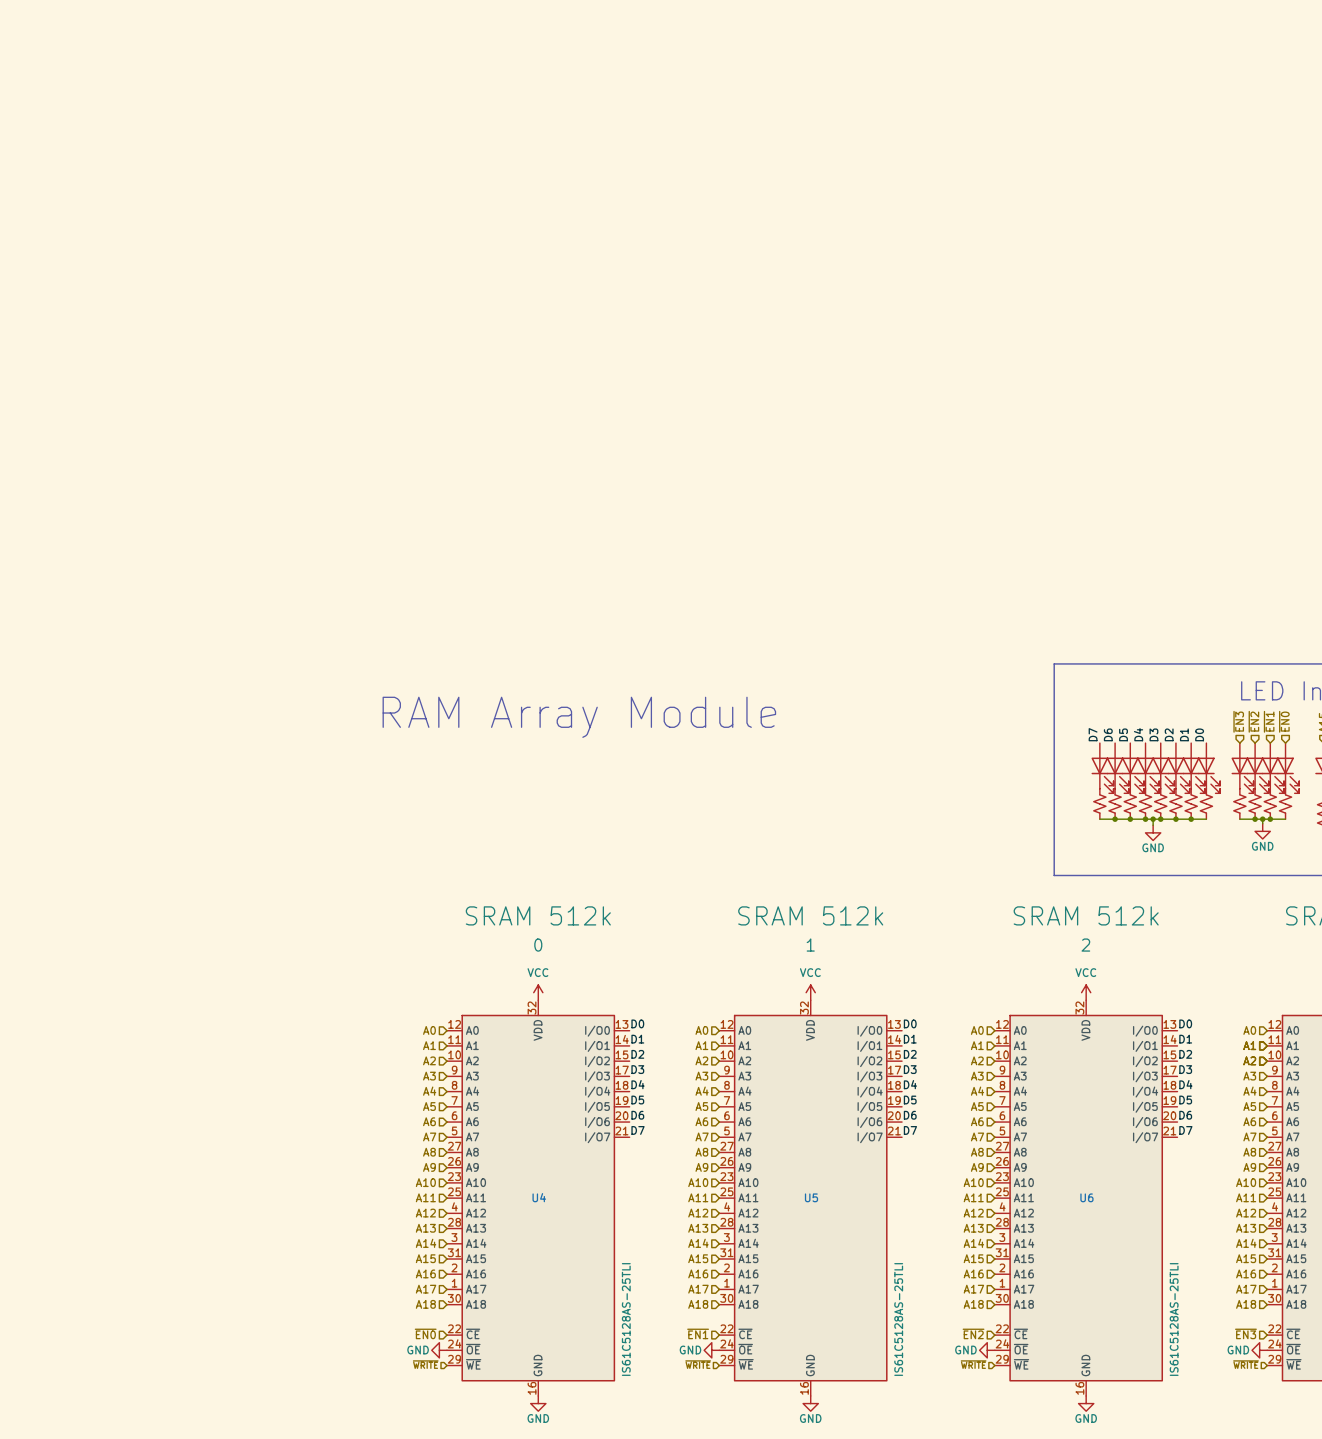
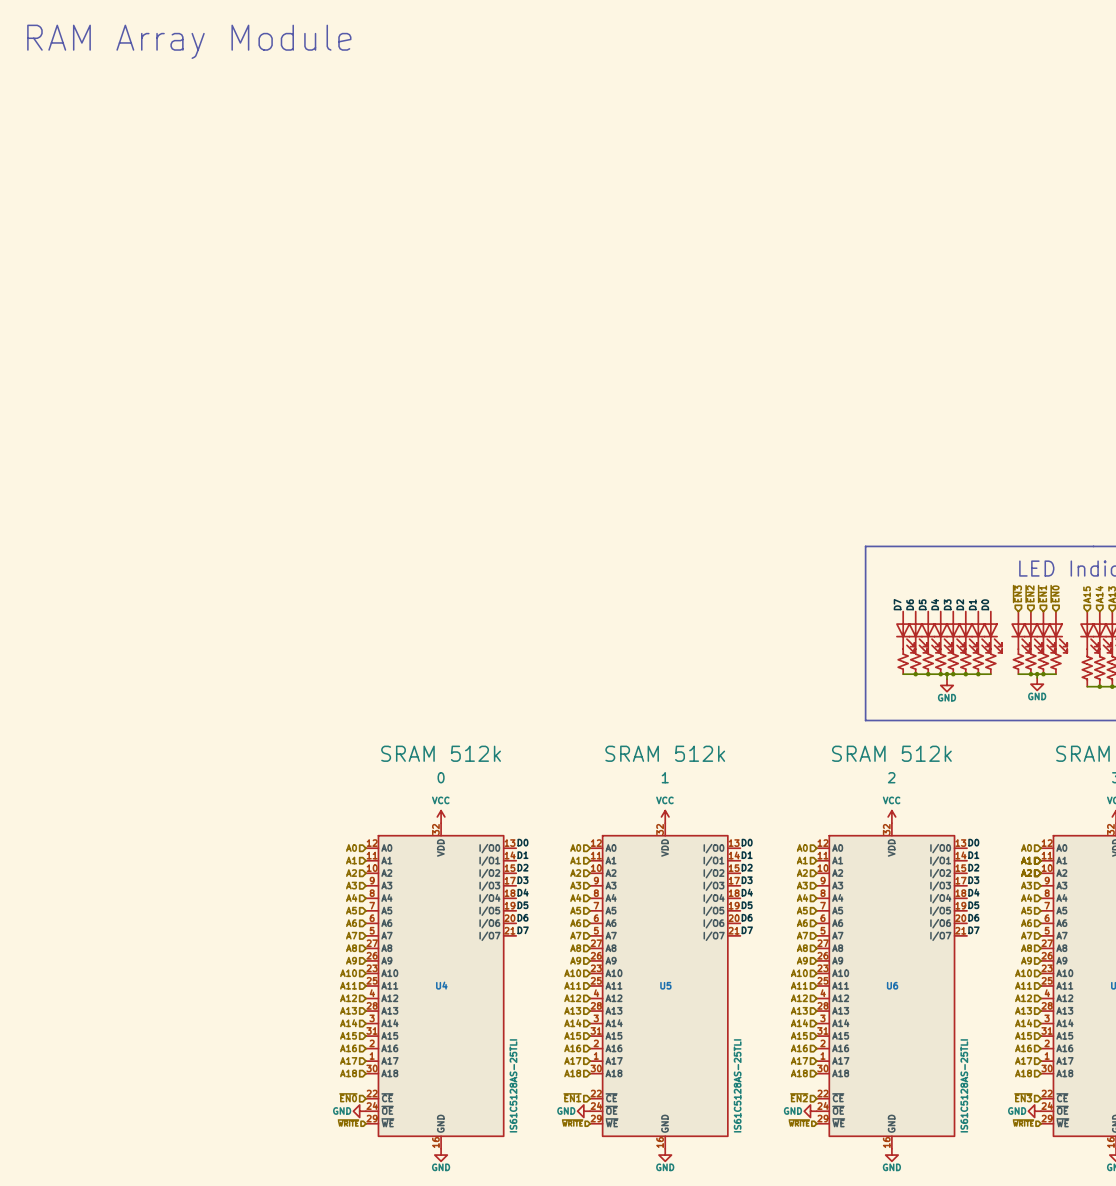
text: none -> RAM Array Module (189, 41)
text: RAM Array Module (579, 717) -> none

